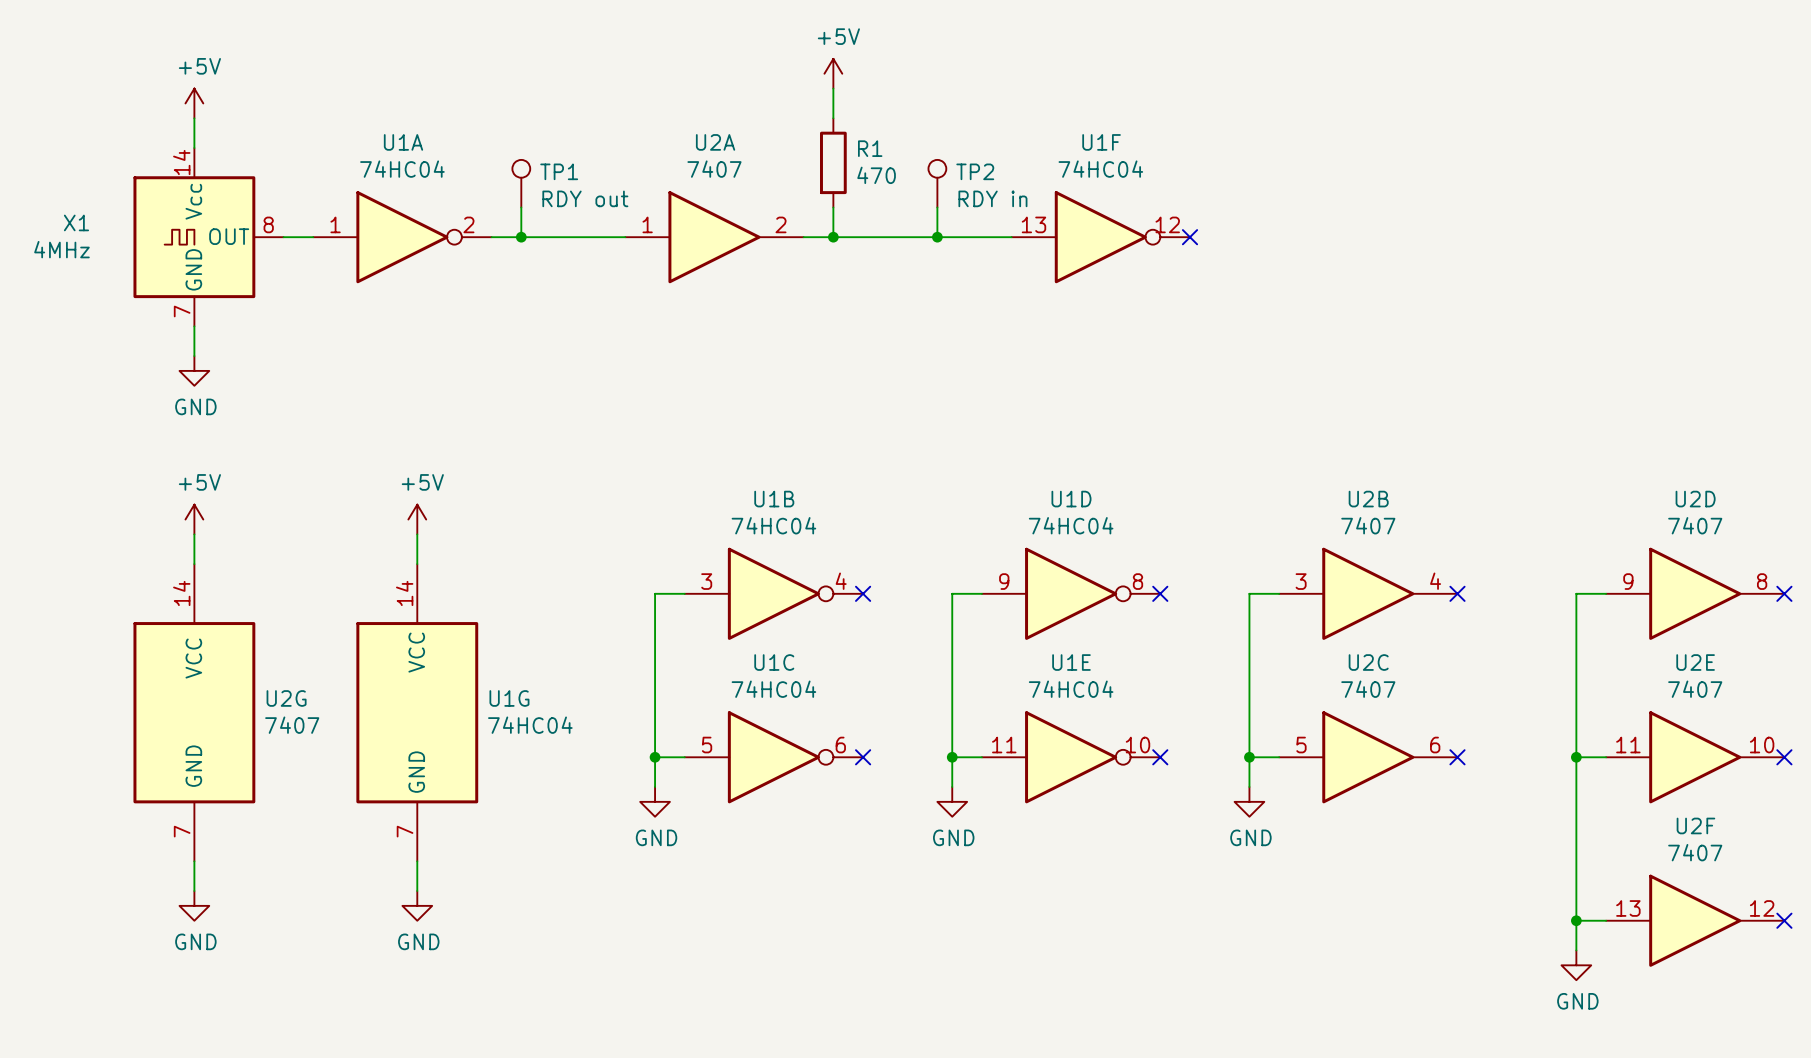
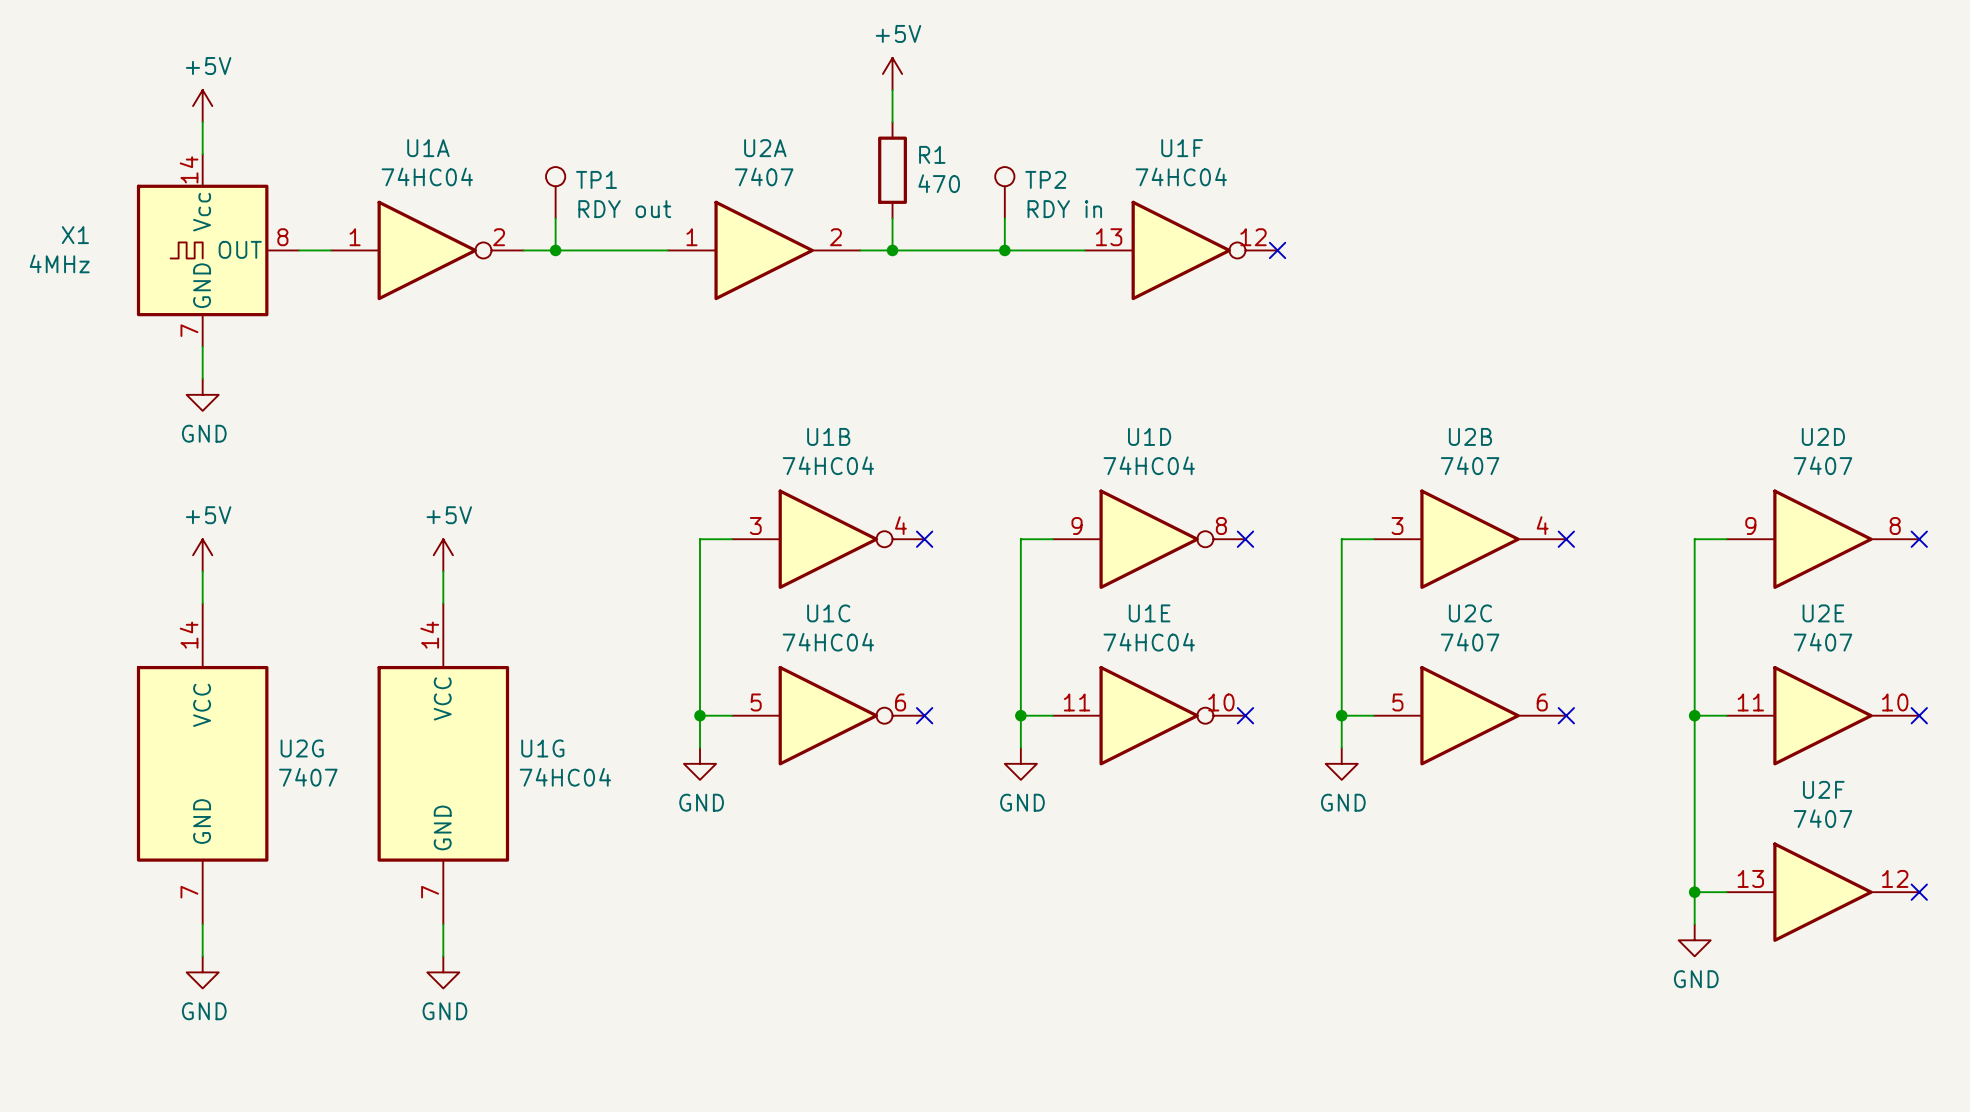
no-connect mark: none -> (924, 539)
no-connect mark: none -> (1245, 539)
no-connect mark: none -> (1566, 539)
no-connect mark: none -> (1919, 539)
wire: (655, 593) (684, 593) -> (700, 635) (700, 539) (732, 539)
U1B position: (773, 593) -> (828, 539)
no-connect mark: (863, 593) -> none
wire: (952, 593) (981, 593) -> (1020, 635) (1020, 539) (1052, 539)
U1D position: (1071, 593) -> (1149, 539)
no-connect mark: (1160, 593) -> none
wire: (1249, 593) (1279, 593) -> (1341, 635) (1341, 539) (1373, 539)
U2B position: (1368, 593) -> (1470, 539)
no-connect mark: (1457, 593) -> none
wire: (1576, 593) (1606, 593) -> (1694, 635) (1694, 539) (1726, 539)
U2D position: (1695, 593) -> (1823, 539)
no-connect mark: (1784, 593) -> none
junction: none -> (700, 715)
no-connect mark: none -> (924, 715)
junction: none -> (1020, 715)
no-connect mark: none -> (1245, 715)
junction: none -> (1341, 715)
no-connect mark: none -> (1566, 715)
junction: none -> (1694, 715)
no-connect mark: none -> (1919, 715)
wire: (655, 697) (655, 787) -> none
wire: (952, 697) (952, 787) -> none
wire: (1249, 697) (1249, 787) -> none
wire: (655, 757) (684, 757) -> (700, 715) (732, 715)
junction: (655, 757) -> none
U1C position: (773, 757) -> (828, 715)
no-connect mark: (863, 757) -> none
wire: (952, 757) (981, 757) -> (1020, 715) (1052, 715)
junction: (952, 757) -> none
U1E position: (1071, 757) -> (1149, 715)
no-connect mark: (1160, 757) -> none
wire: (1249, 757) (1279, 757) -> (1341, 715) (1373, 715)
junction: (1249, 757) -> none
U2C position: (1368, 757) -> (1470, 715)
no-connect mark: (1457, 757) -> none
wire: (1576, 757) (1606, 757) -> (1694, 892) (1726, 892)
junction: (1576, 757) -> none
U2E position: (1695, 757) -> (1823, 715)
no-connect mark: (1784, 757) -> none
power symbol position: GND (655, 801) -> GND (700, 763)
power symbol position: GND (952, 801) -> GND (1020, 763)
power symbol position: GND (1249, 801) -> GND (1341, 763)
junction: none -> (1694, 892)
no-connect mark: none -> (1919, 892)
wire: (1576, 861) (1576, 950) -> none
wire: (1576, 920) (1606, 920) -> (1694, 715) (1726, 715)
junction: (1576, 920) -> none
U2F position: (1695, 920) -> (1823, 892)
no-connect mark: (1784, 920) -> none
power symbol position: GND (1576, 965) -> GND (1694, 940)

